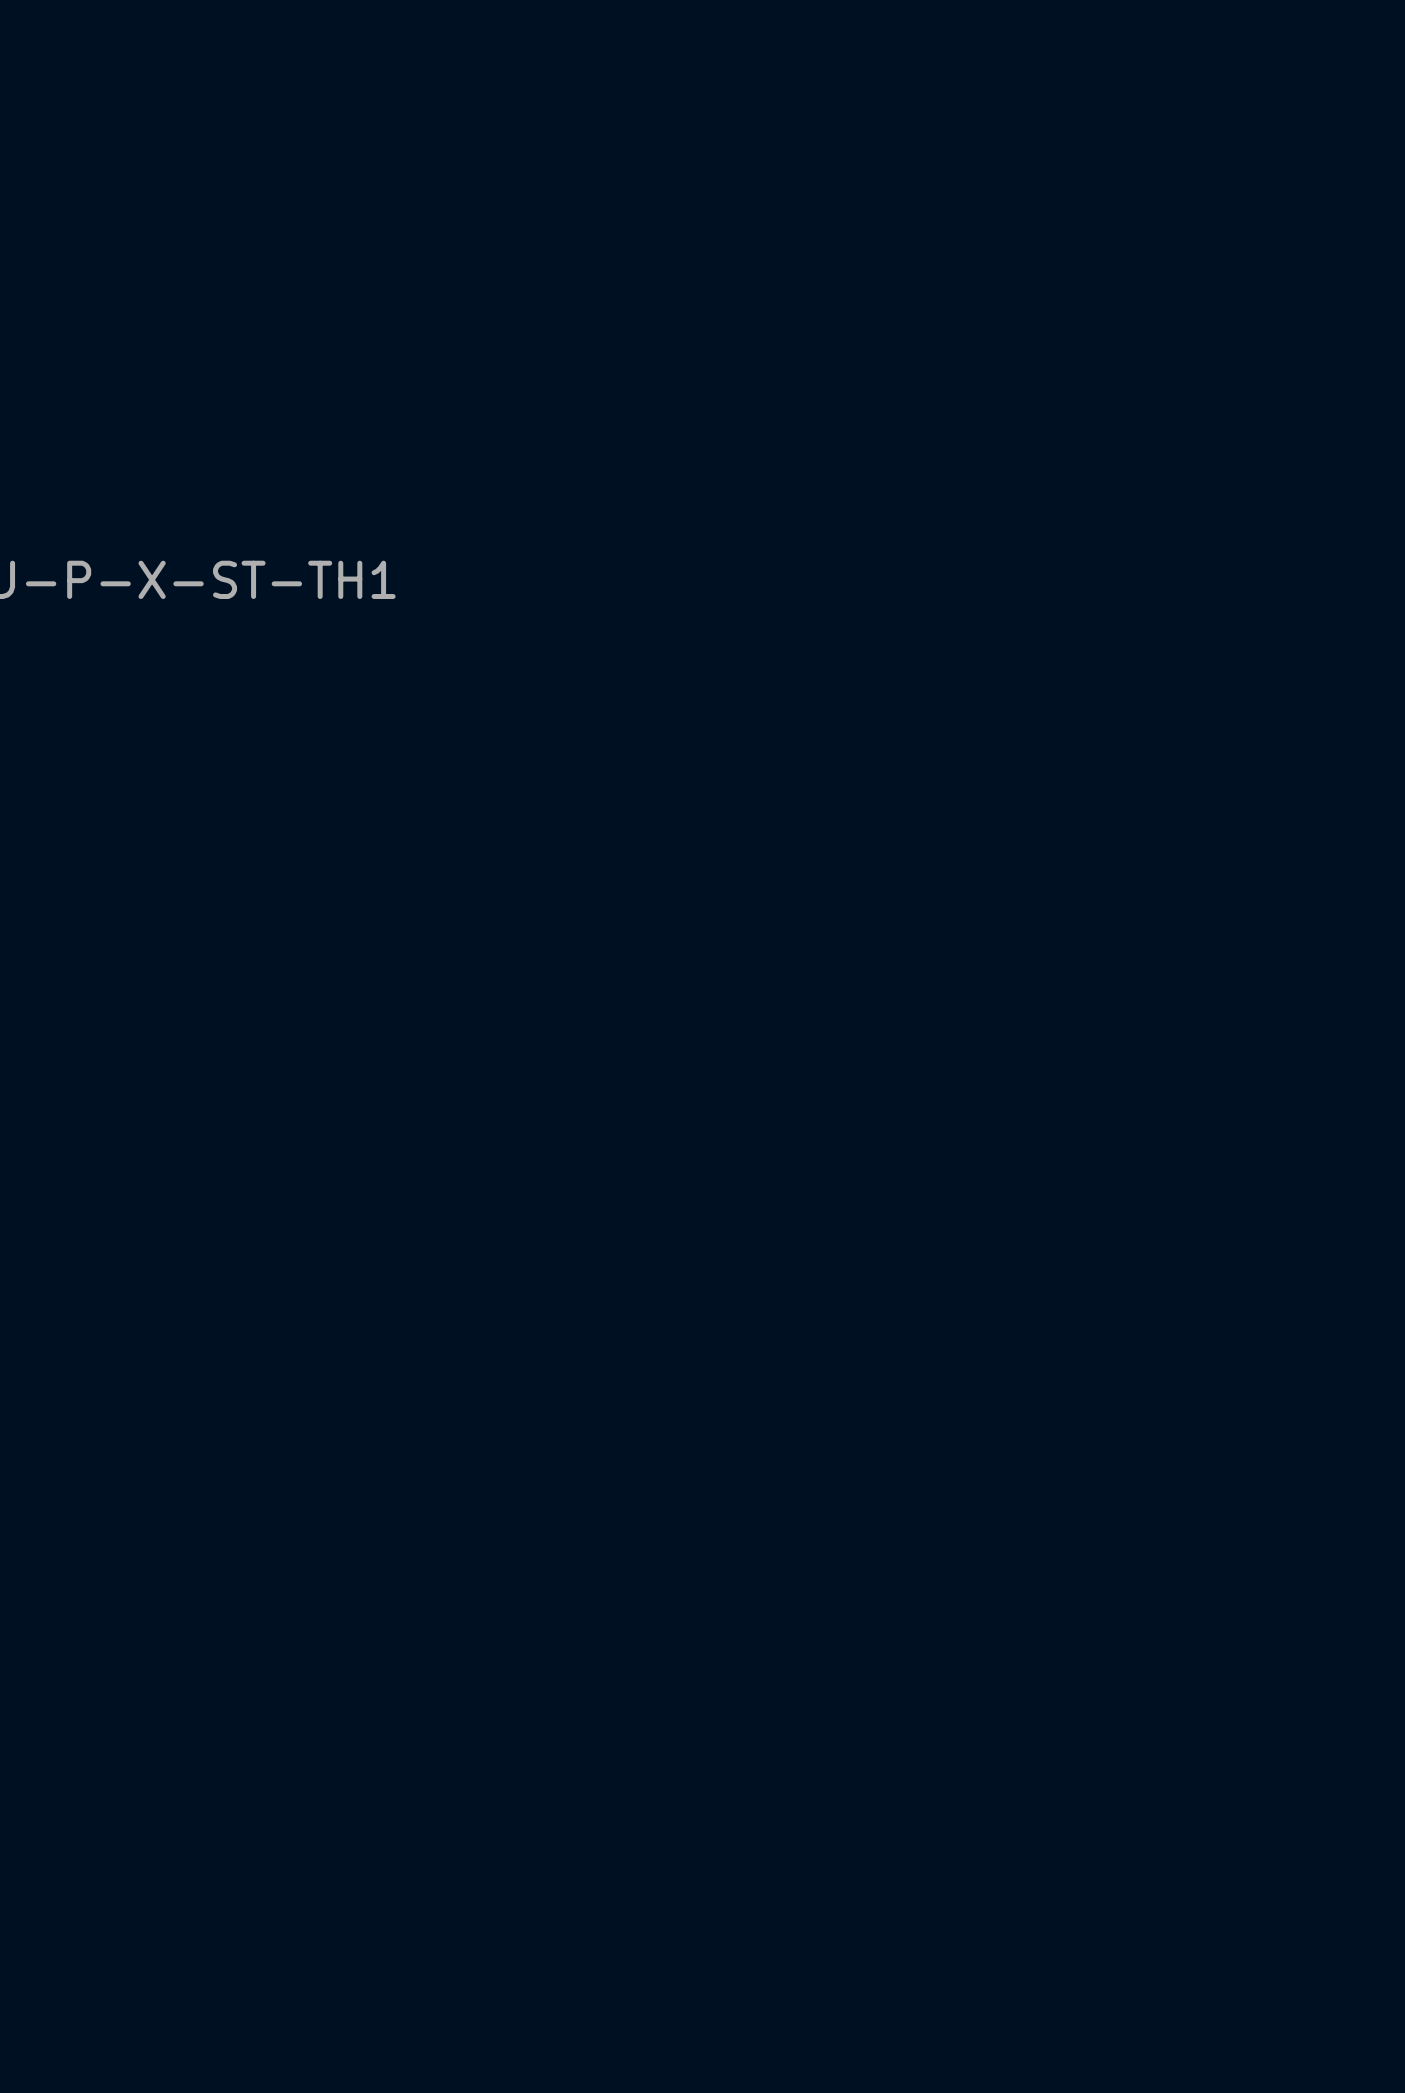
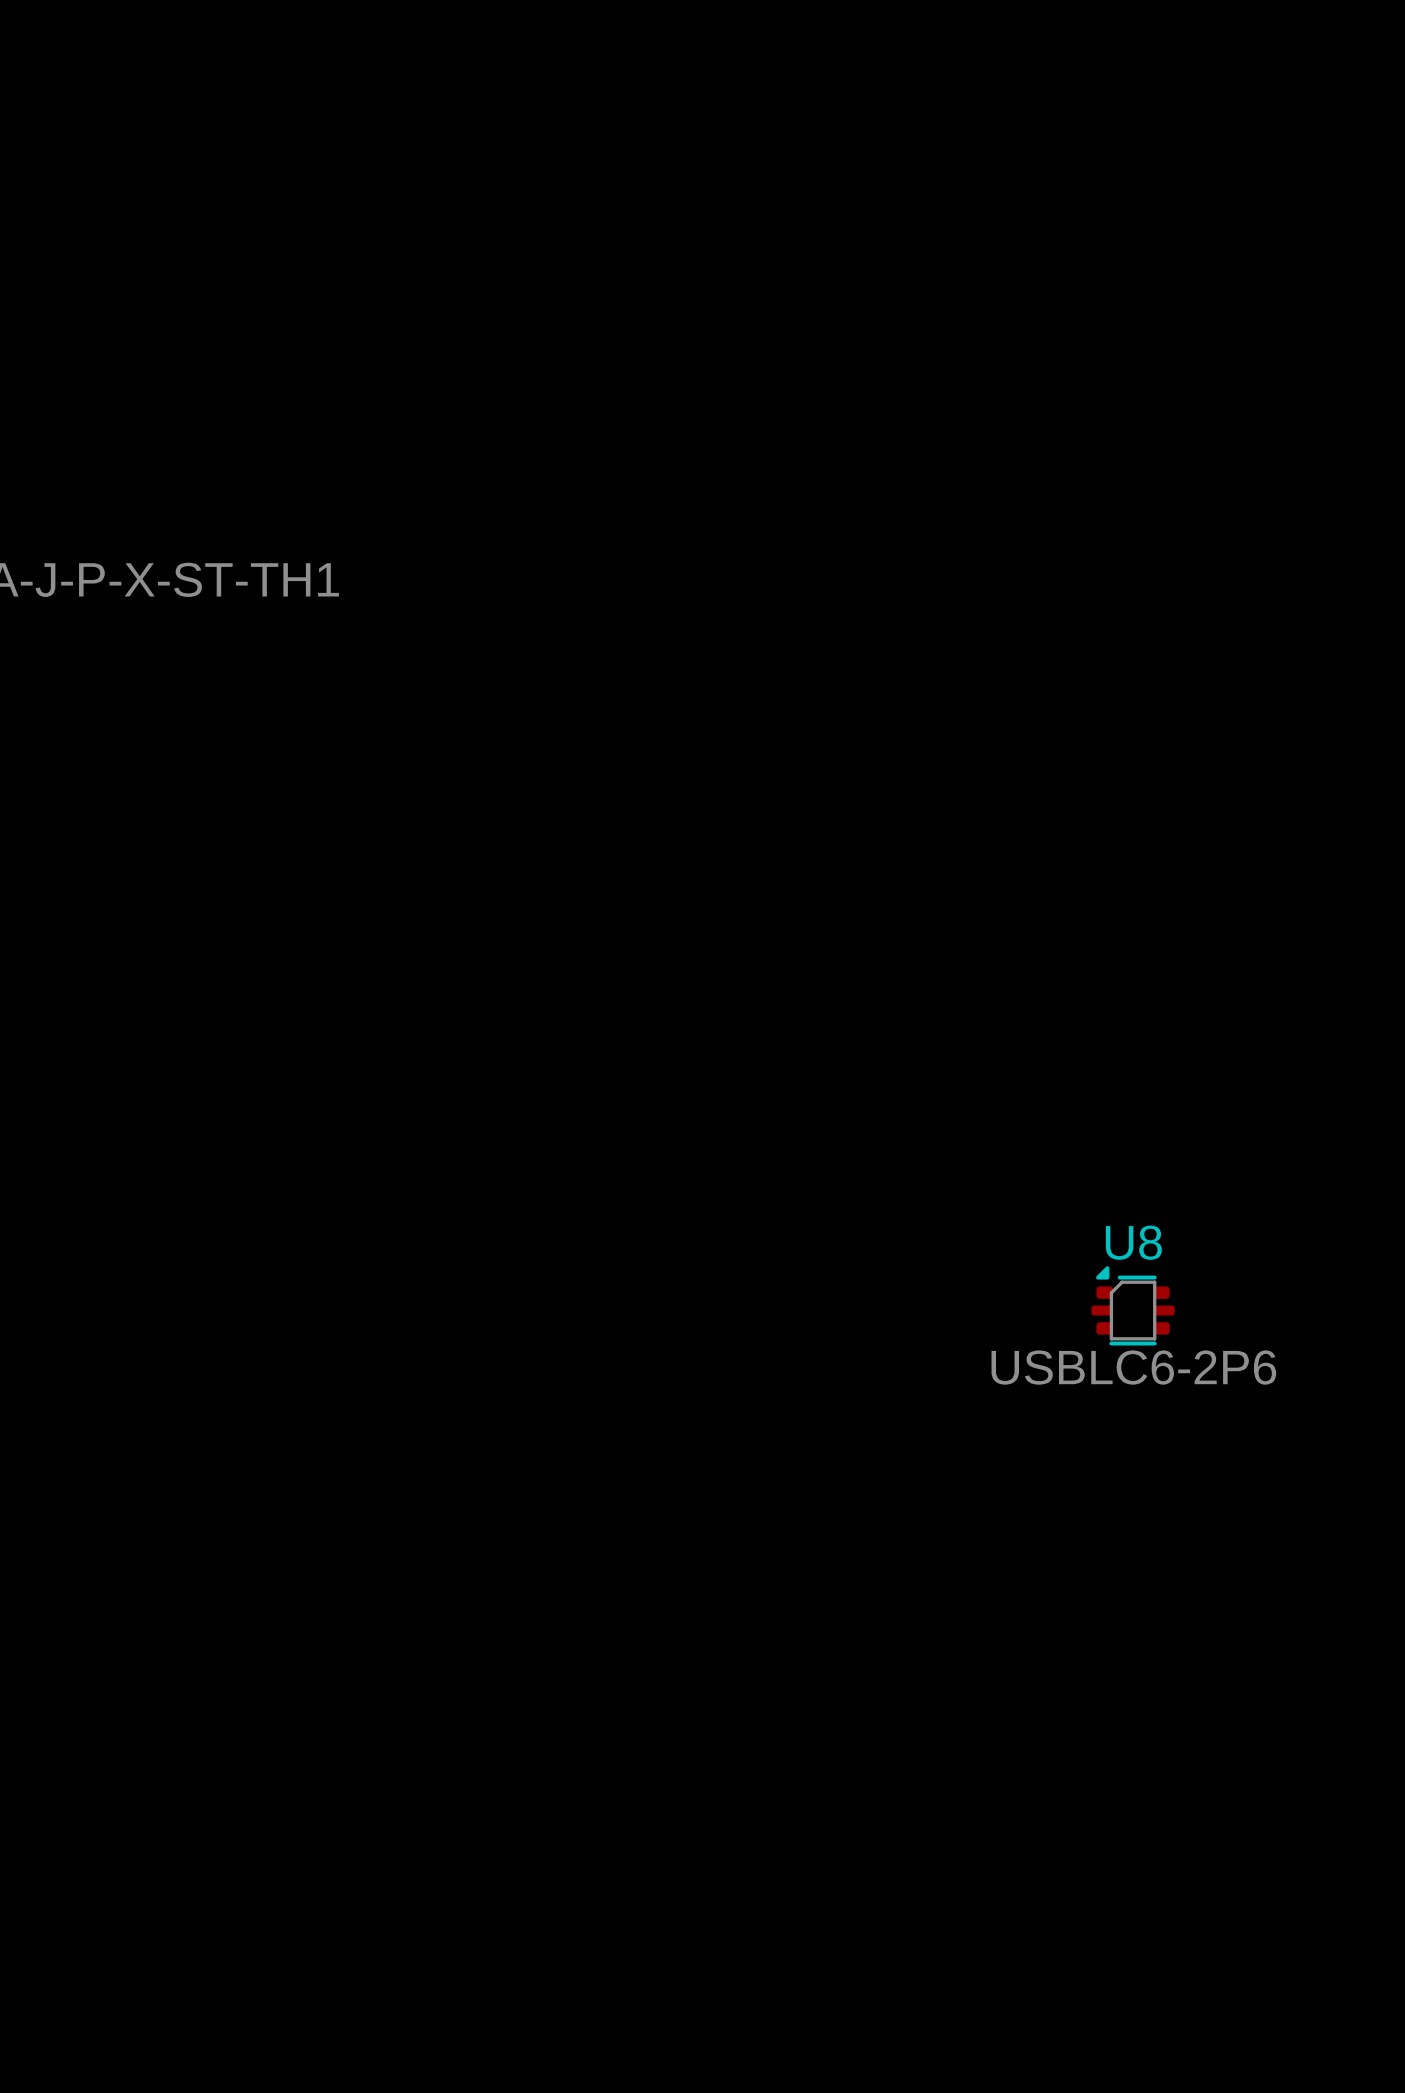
U8: none -> USBLC6-2P6 (1133, 1305)

